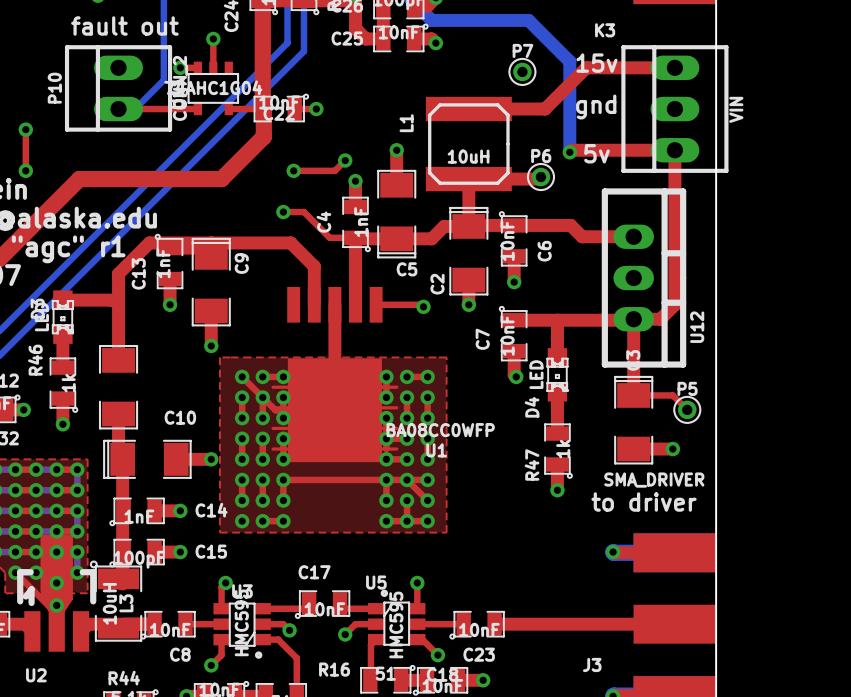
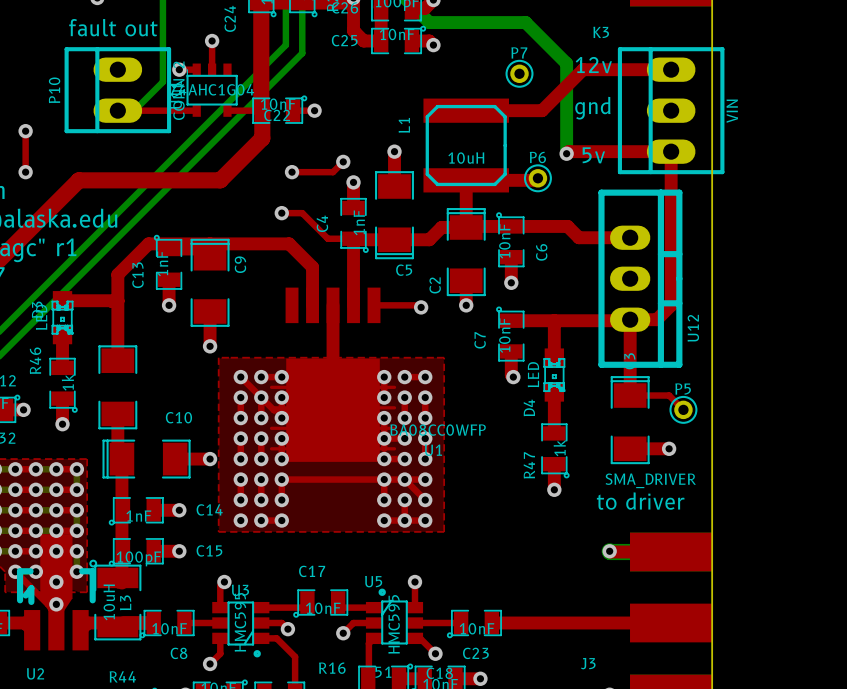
text: 15v (597, 63) -> 12v (593, 65)

